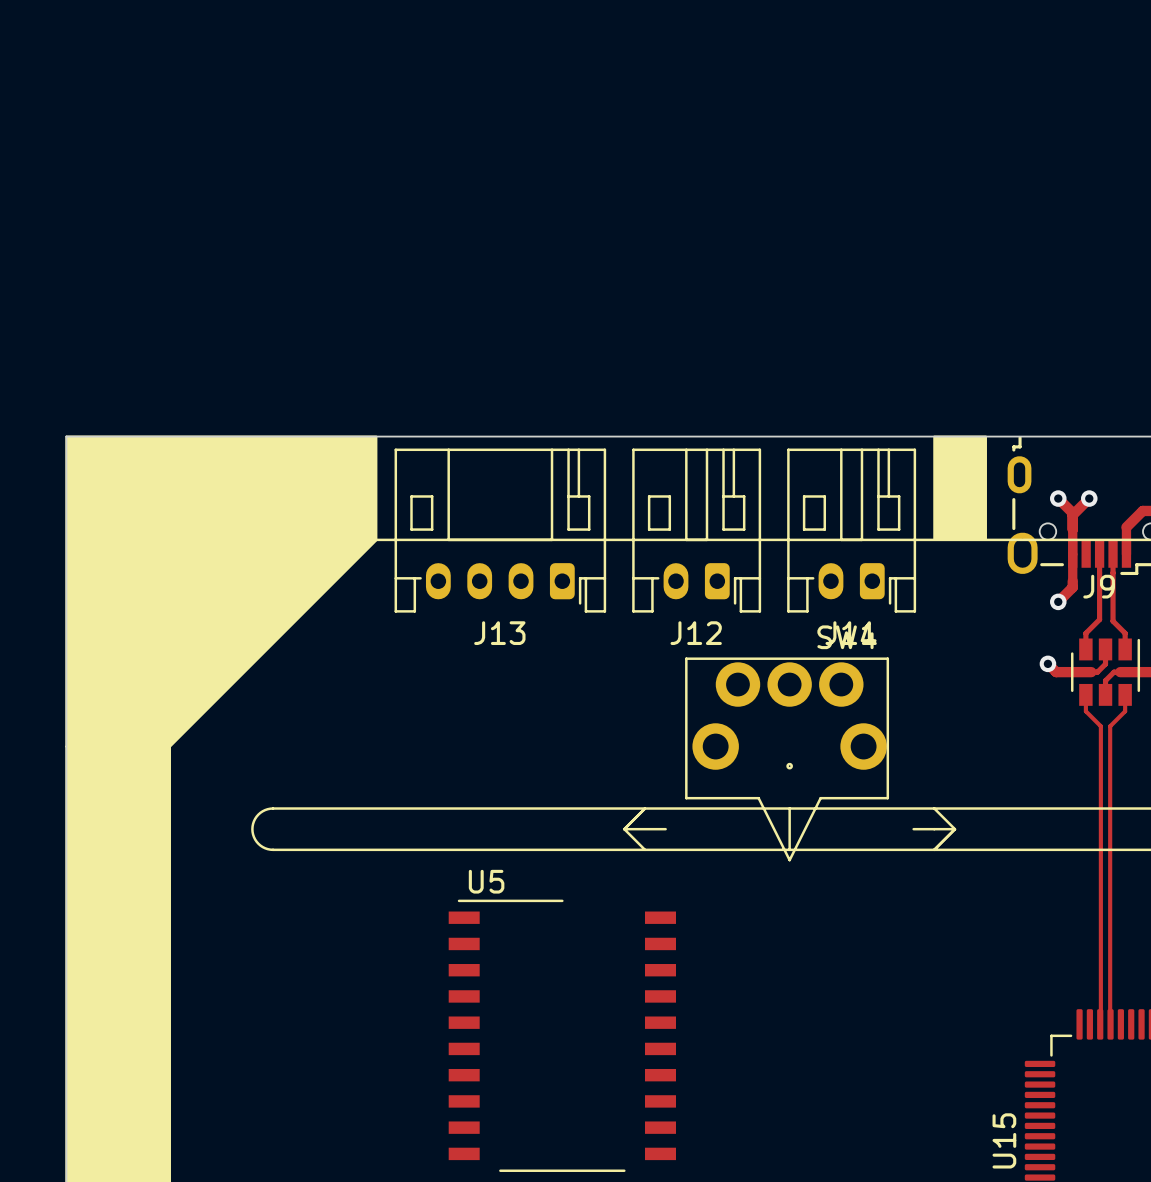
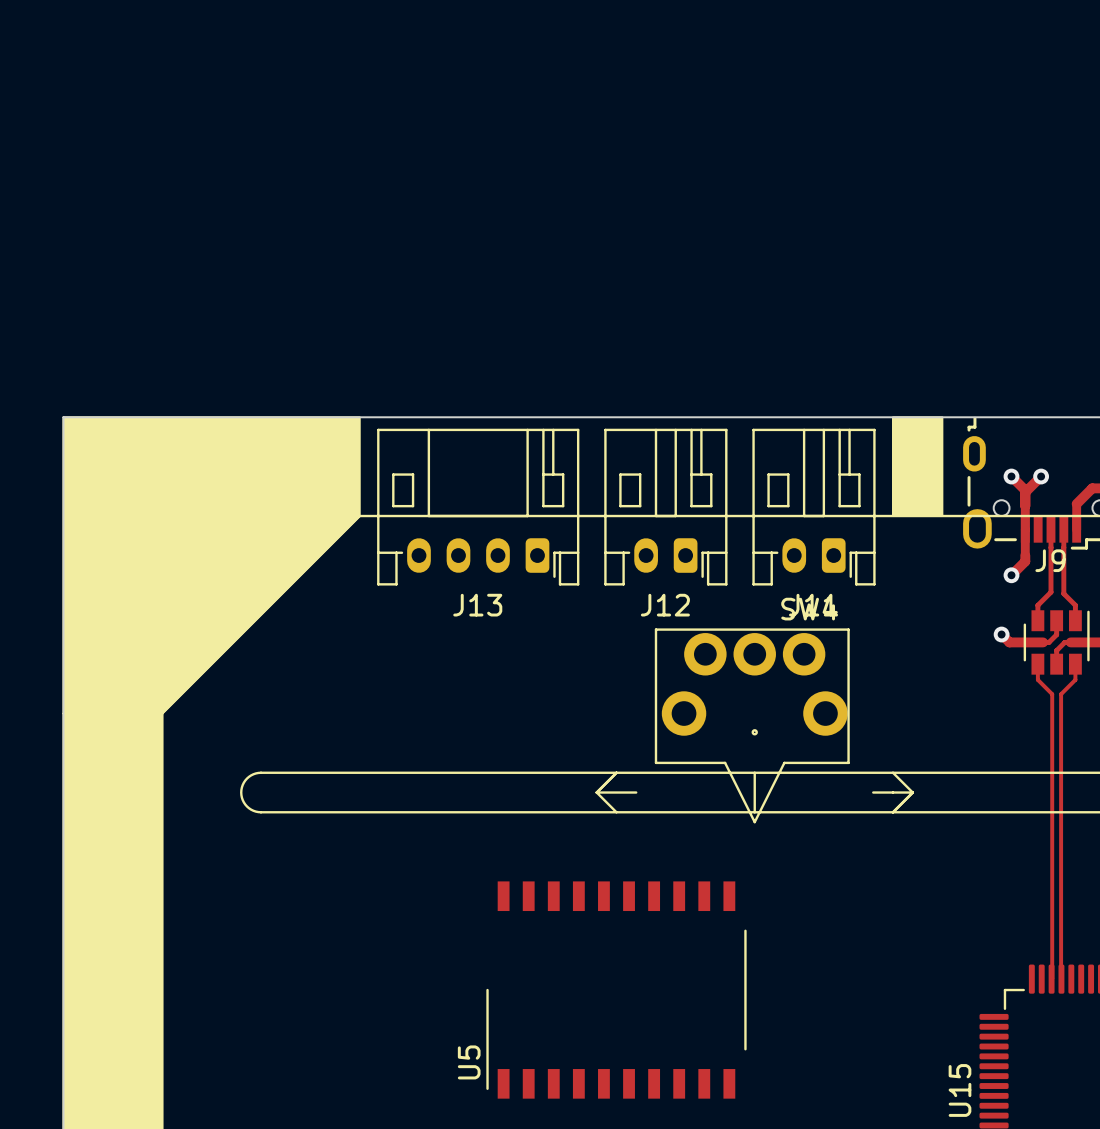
U5 rotation: 0° (562, 1035) -> 90° counterclockwise (616, 990)

